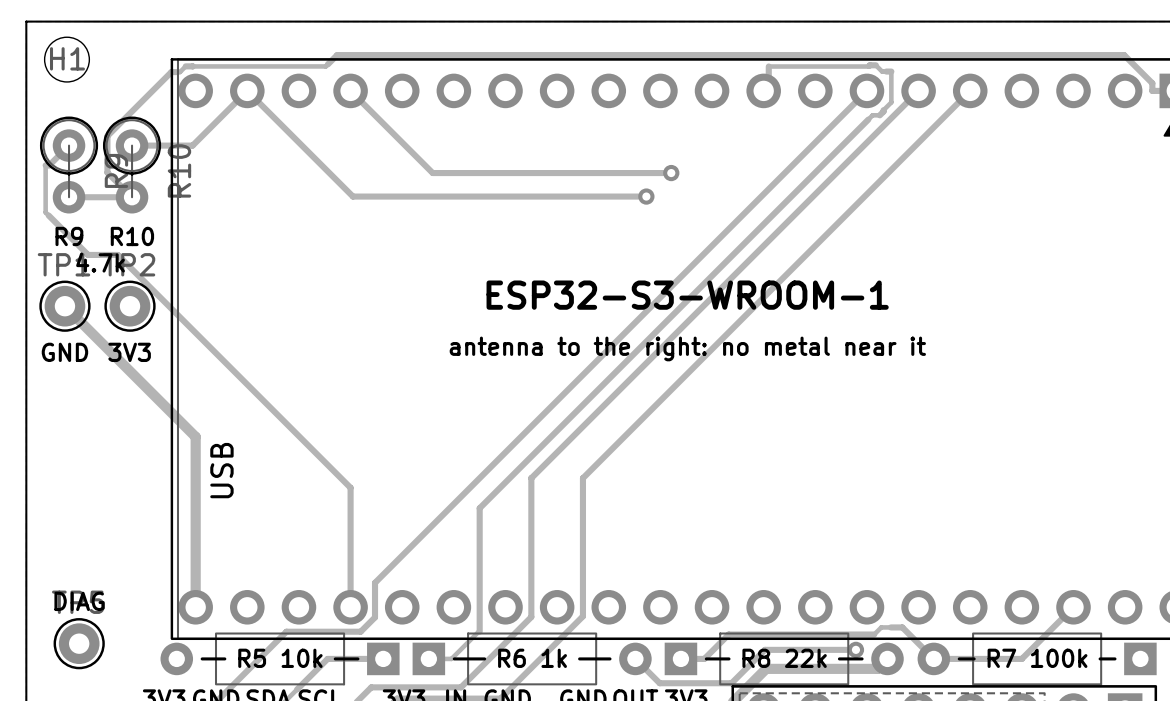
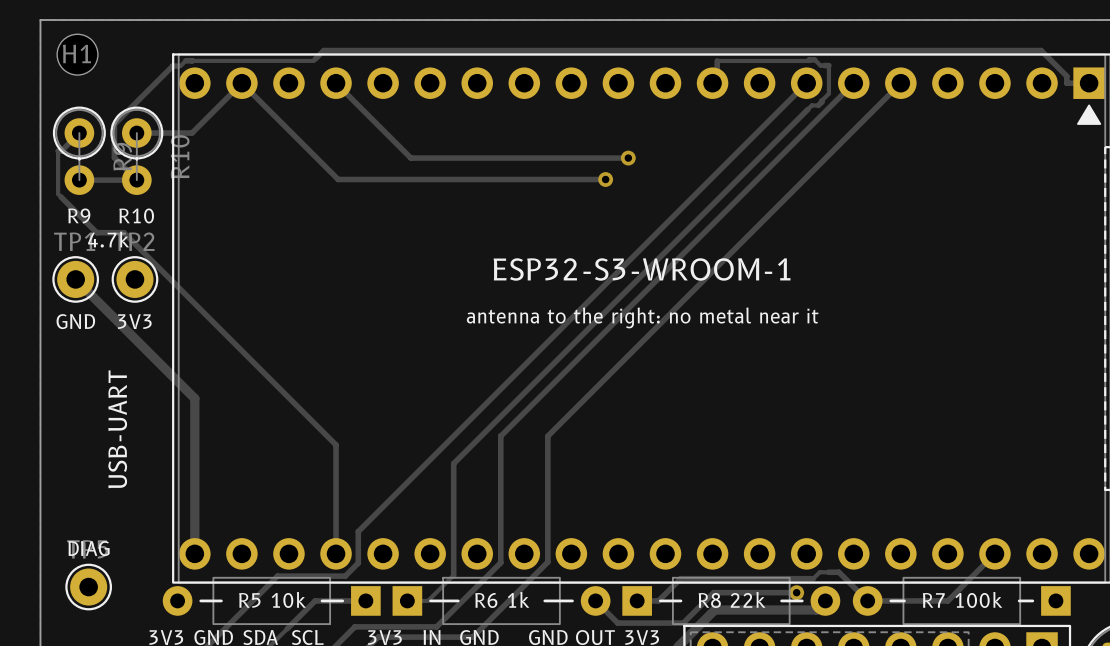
text: none -> USB-UART (117, 429)
part text: USB (221, 470) -> none

